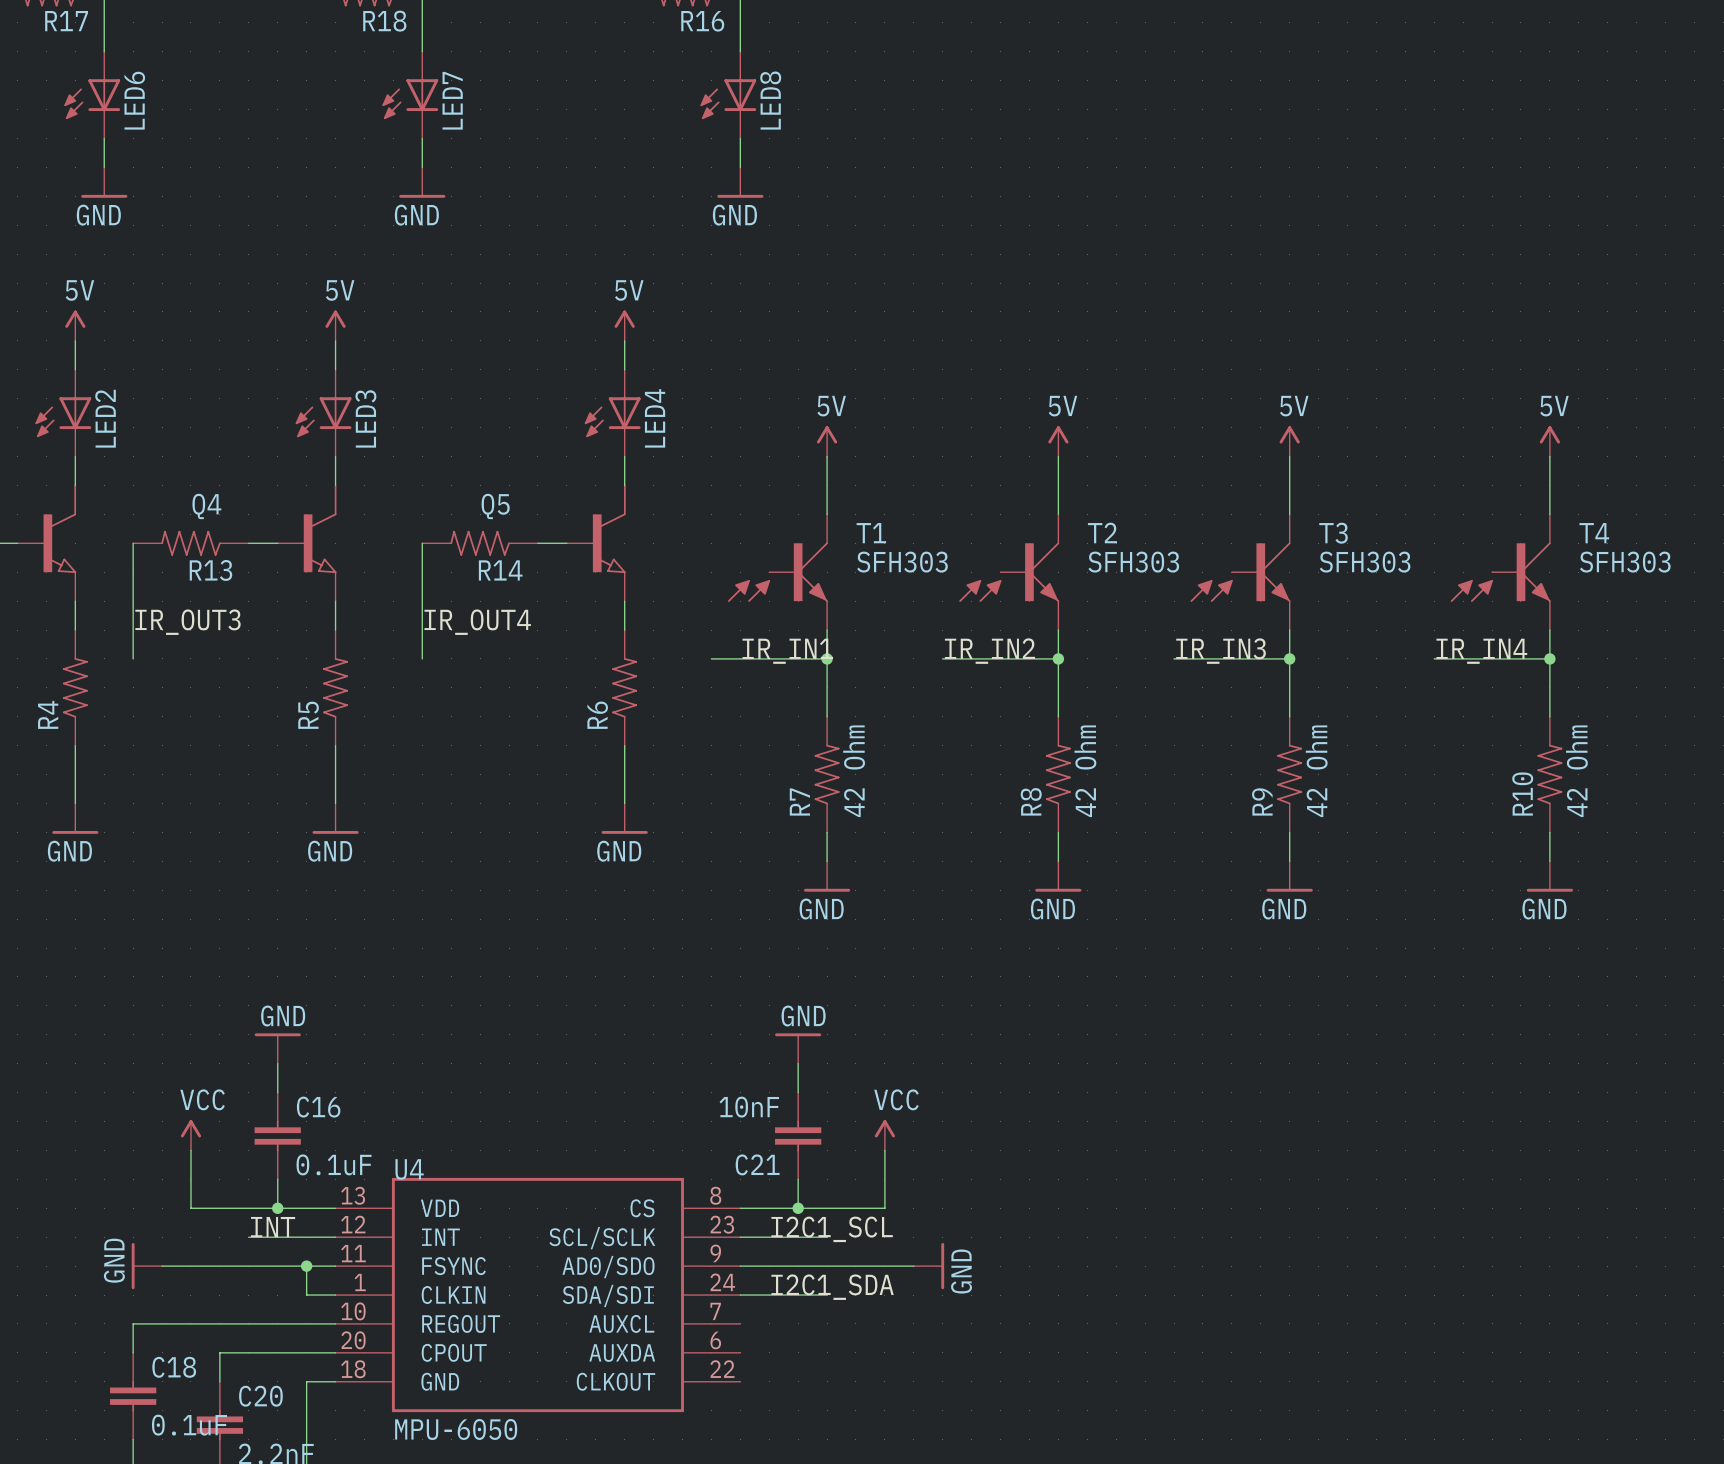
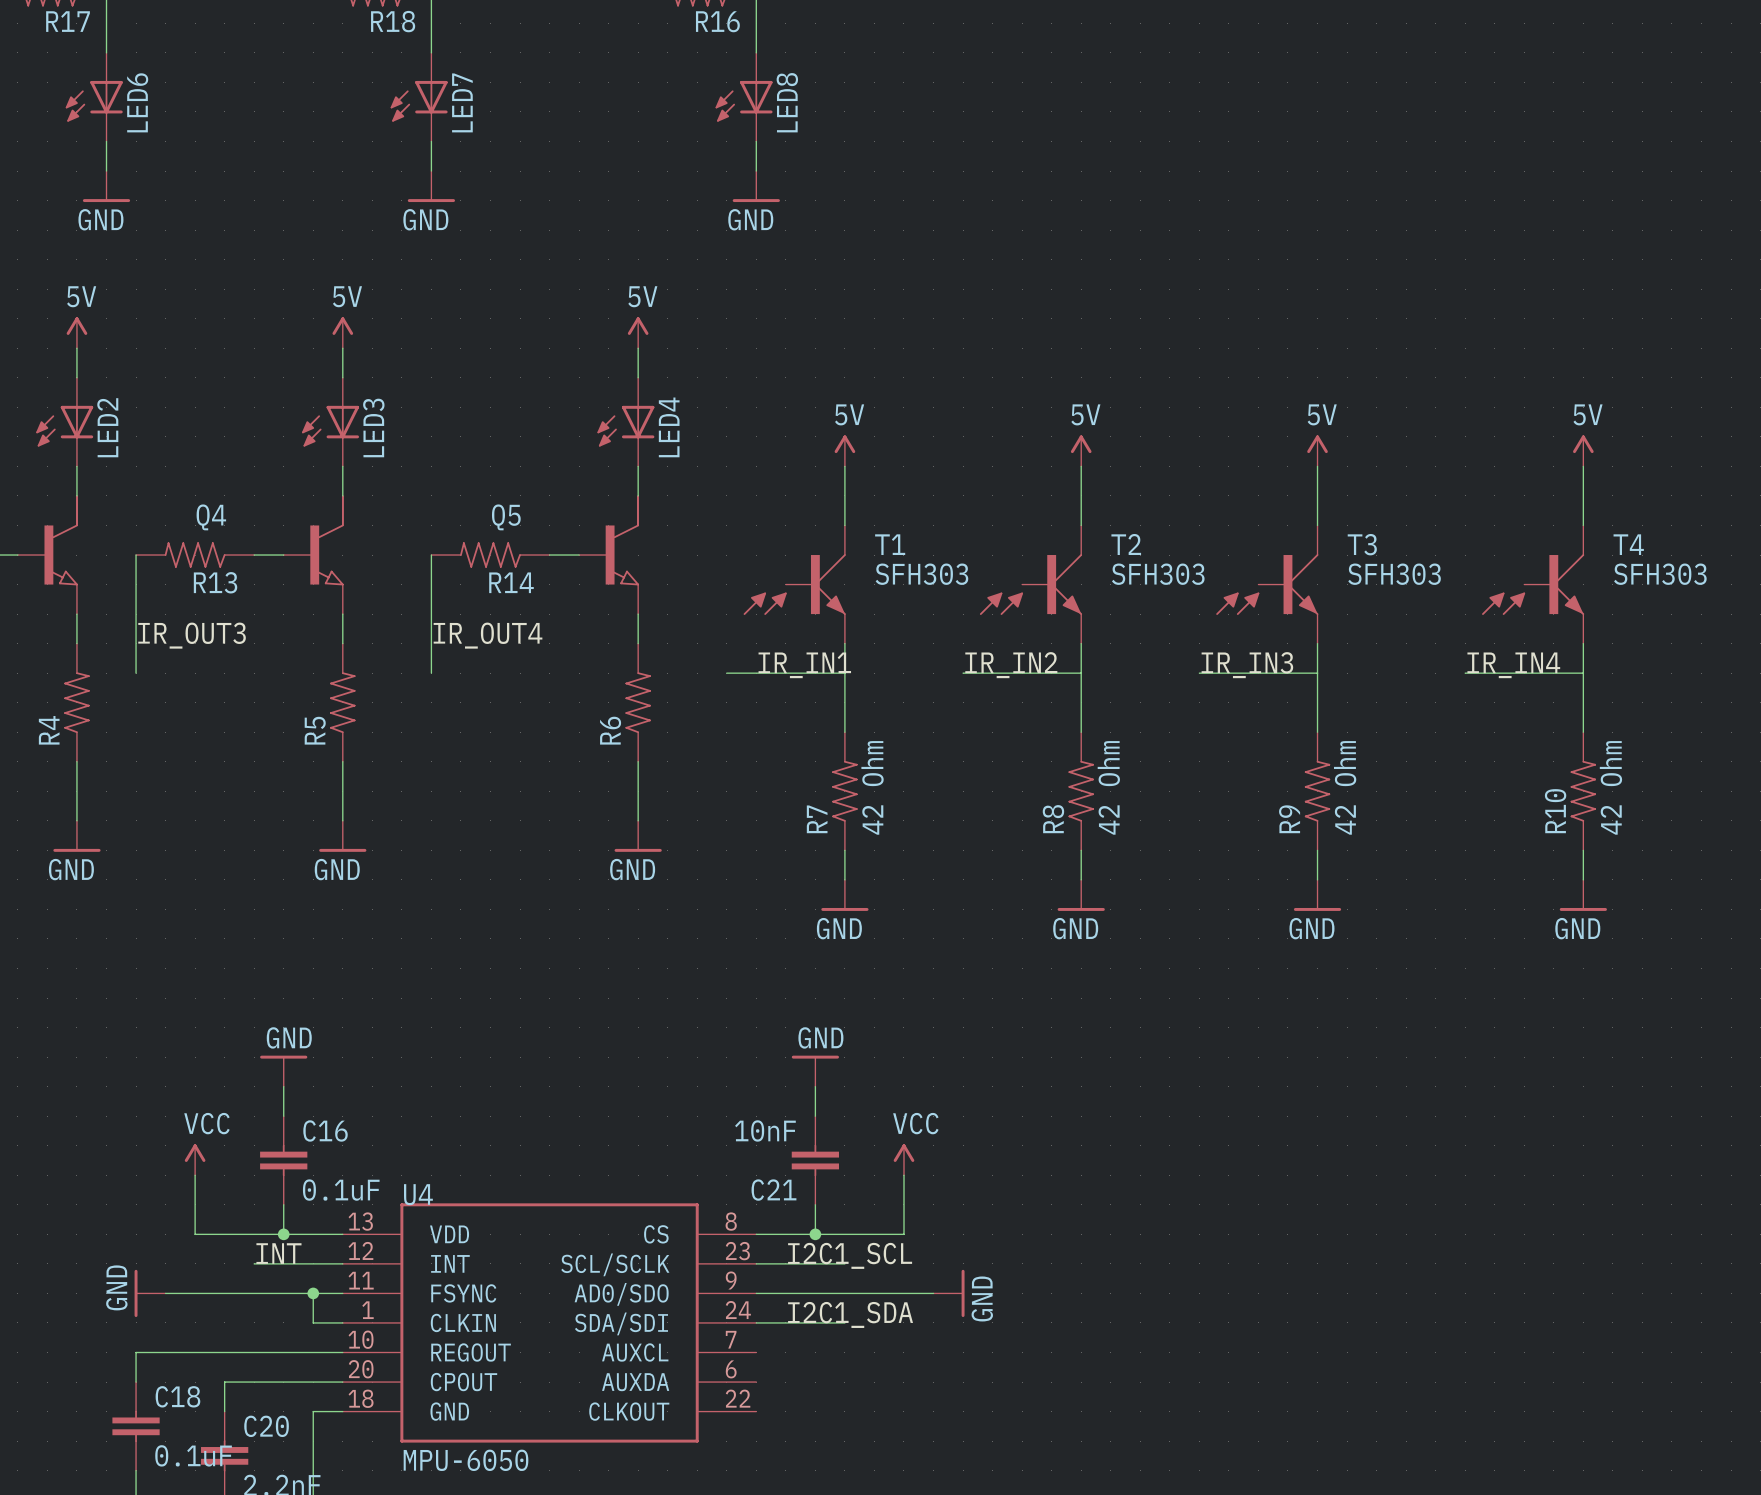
junction: (827, 658) -> none
junction: (1058, 658) -> none
junction: (1289, 658) -> none
junction: (1549, 658) -> none

